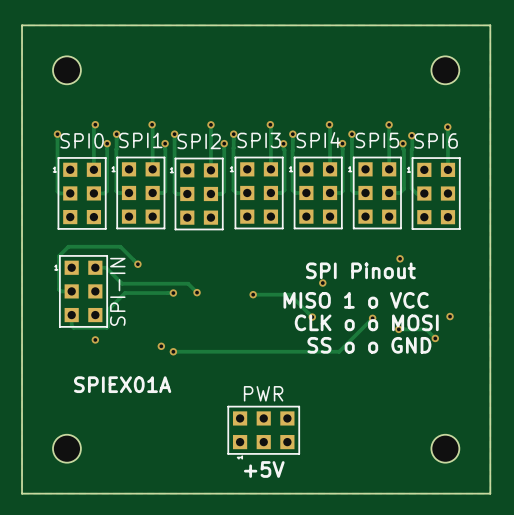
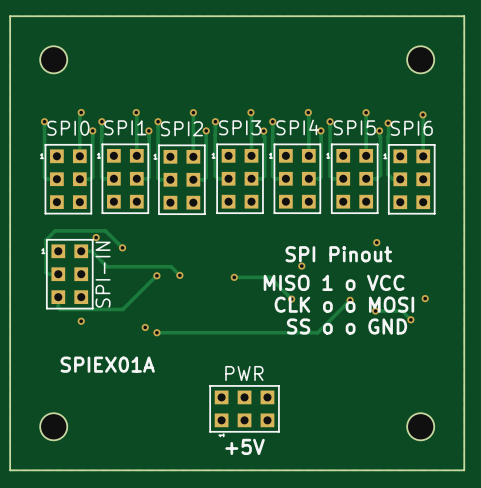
via: none -> (96, 237)
track: (173, 293) (125, 293) (108, 310) (106, 327) -> (156, 275) (122, 309) (92, 309)

